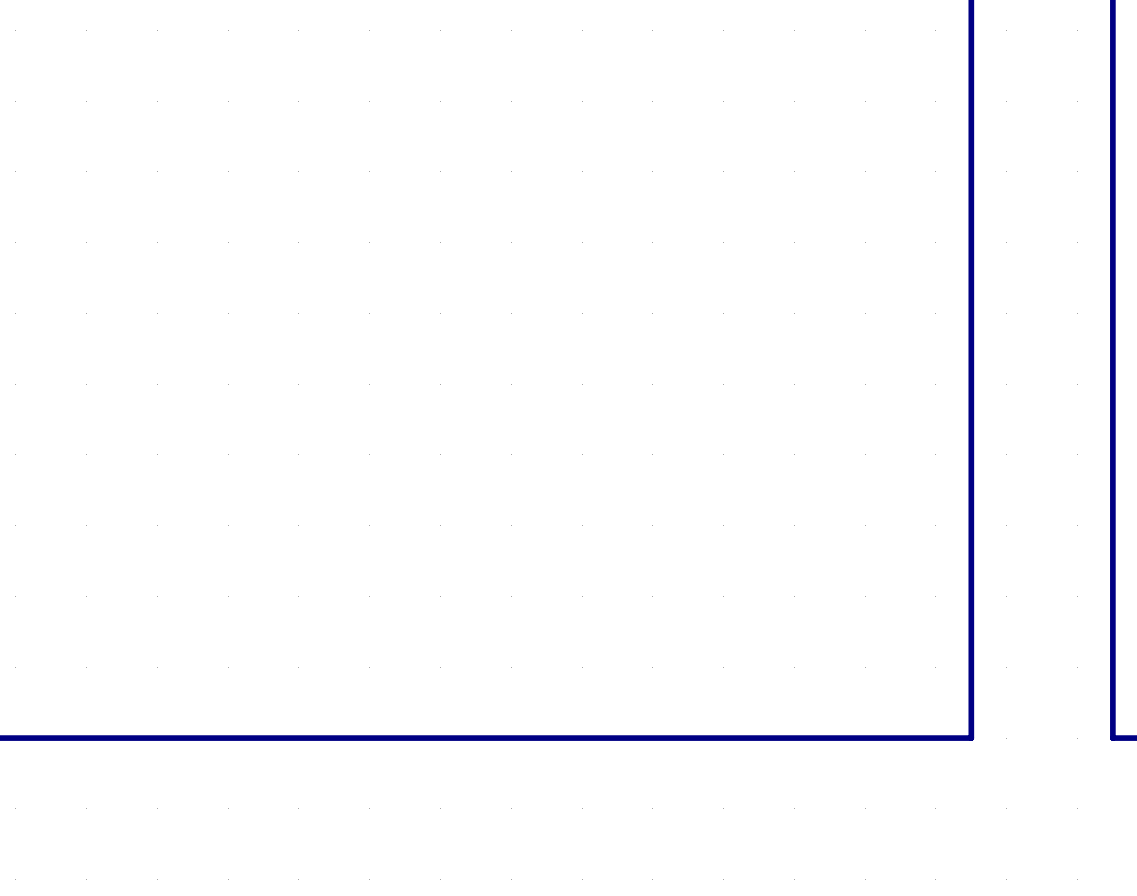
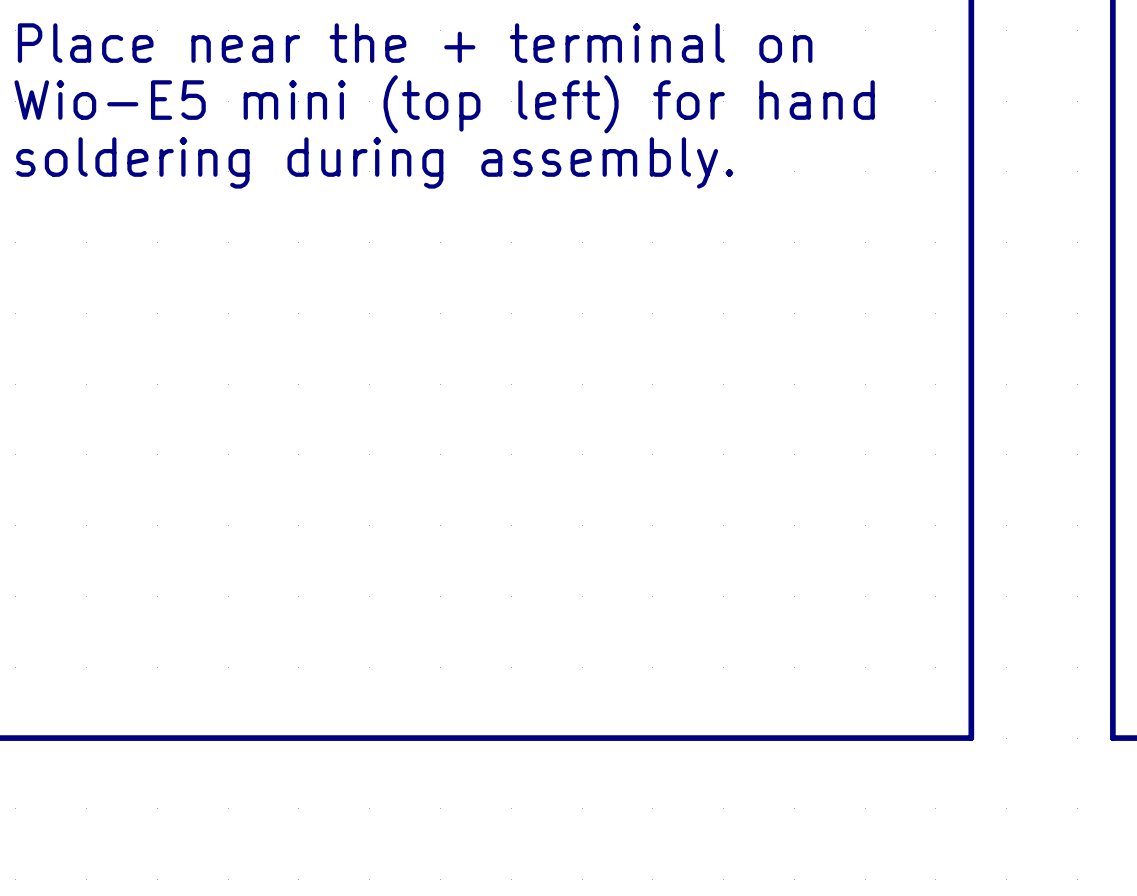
text: none -> Place near the + terminal on (415, 43)
text: none -> Wio-E5 mini (top left) for hand (444, 104)
text: none -> soldering during assembly. (374, 162)

